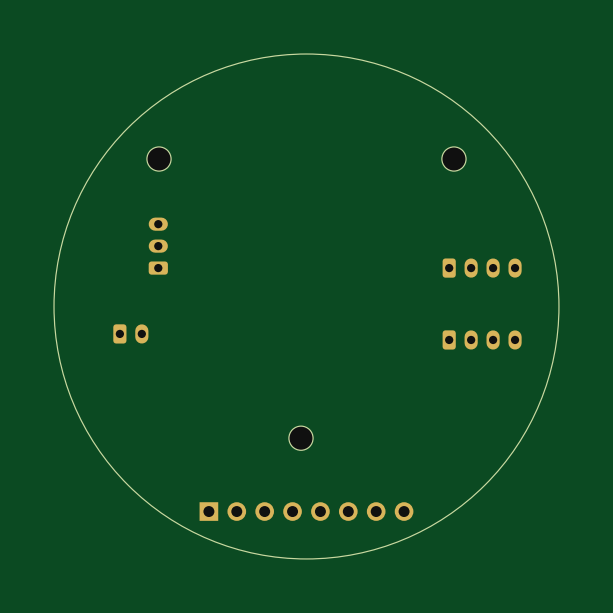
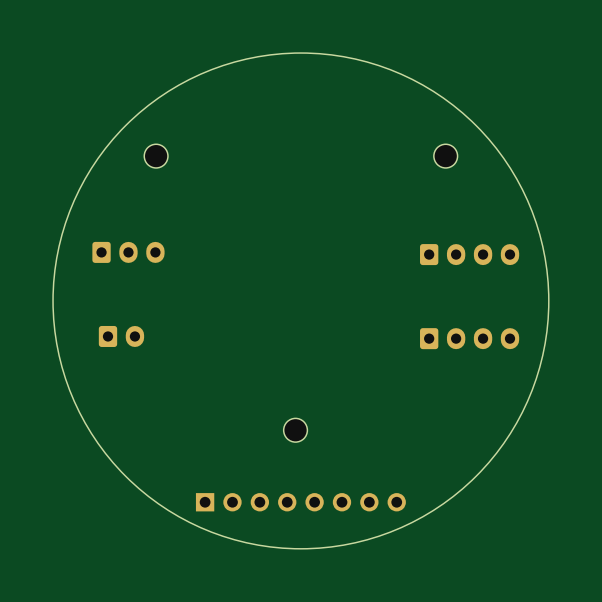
part: (158, 246) -> none
part: none -> (128, 252)
part footprint: [442, 258, 522, 278] -> [420, 244, 520, 266]
part footprint: [442, 330, 522, 350] -> [420, 328, 520, 350]
part: (130, 333) -> none
part: none -> (121, 336)

